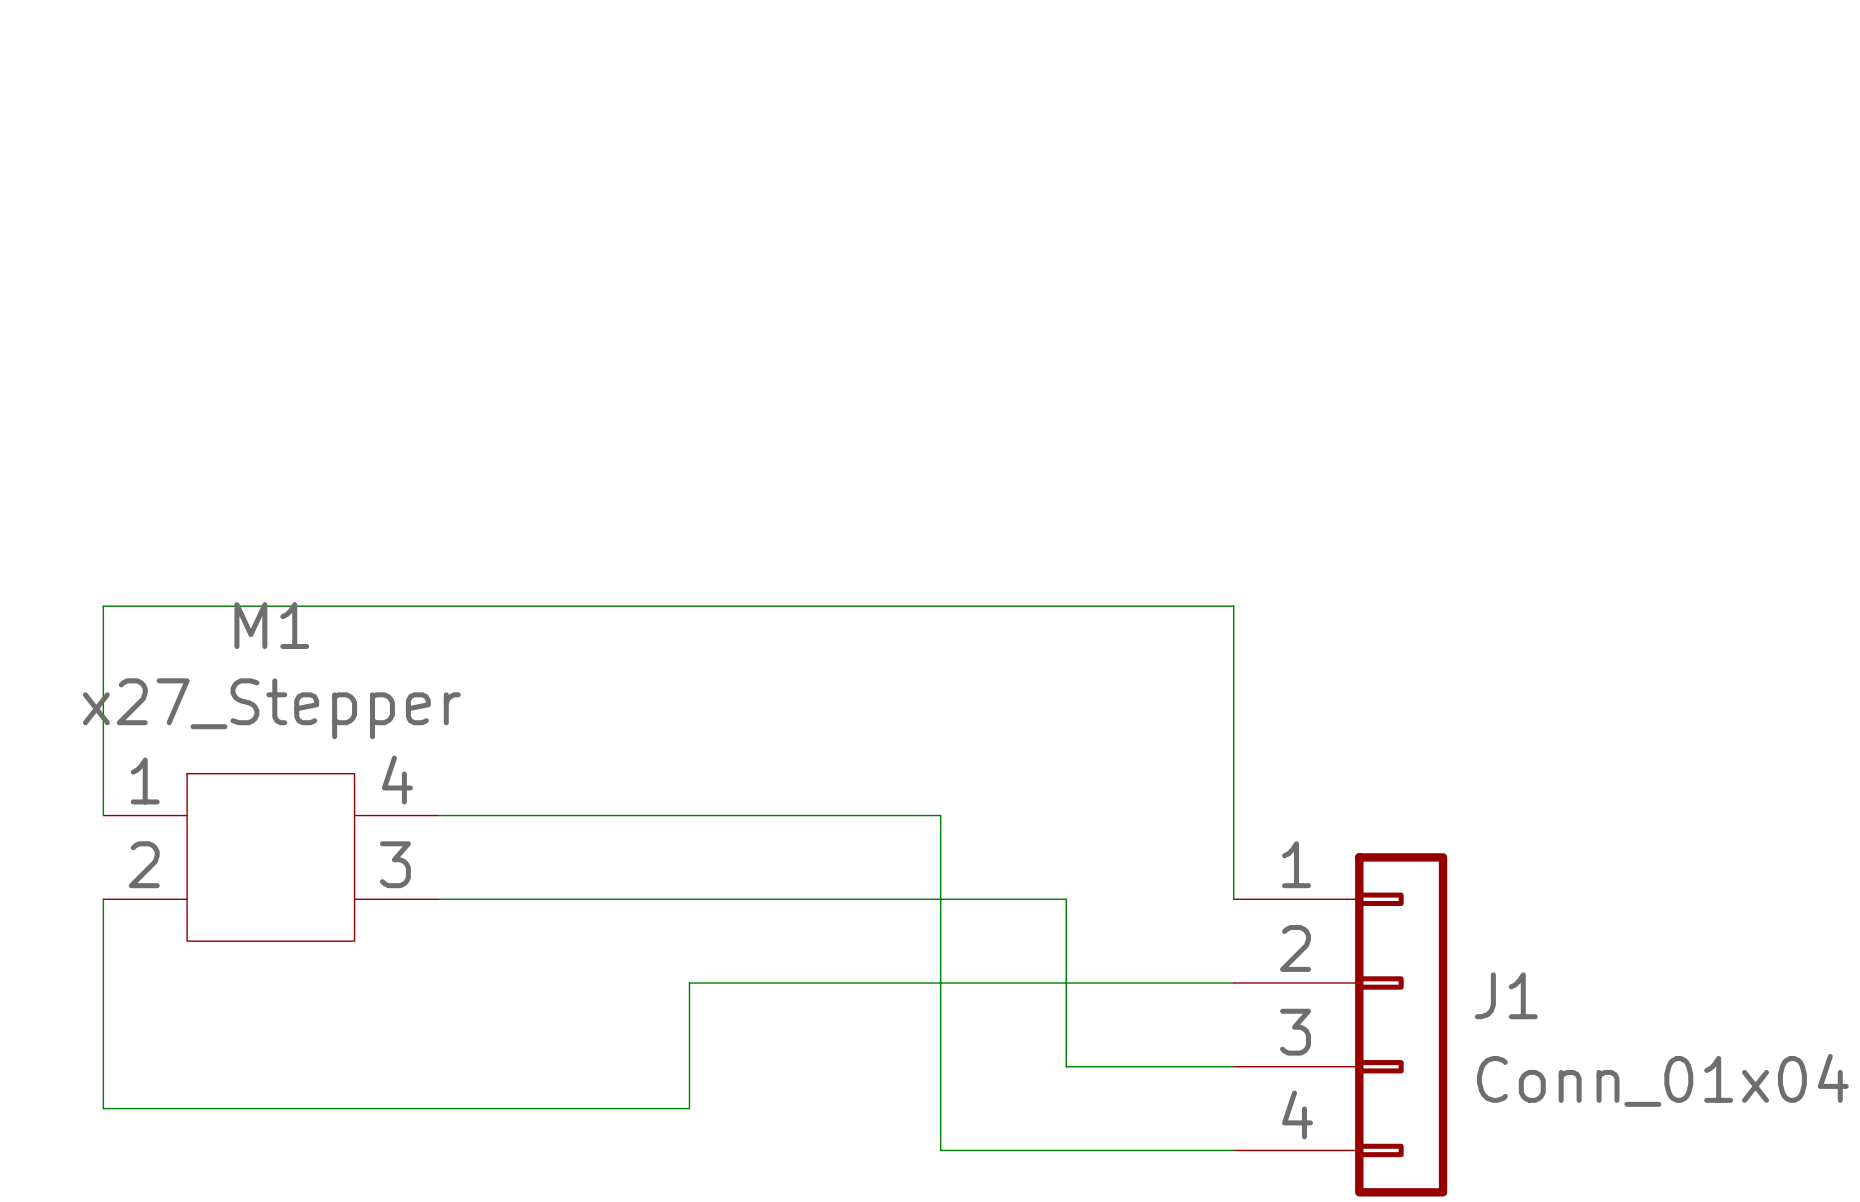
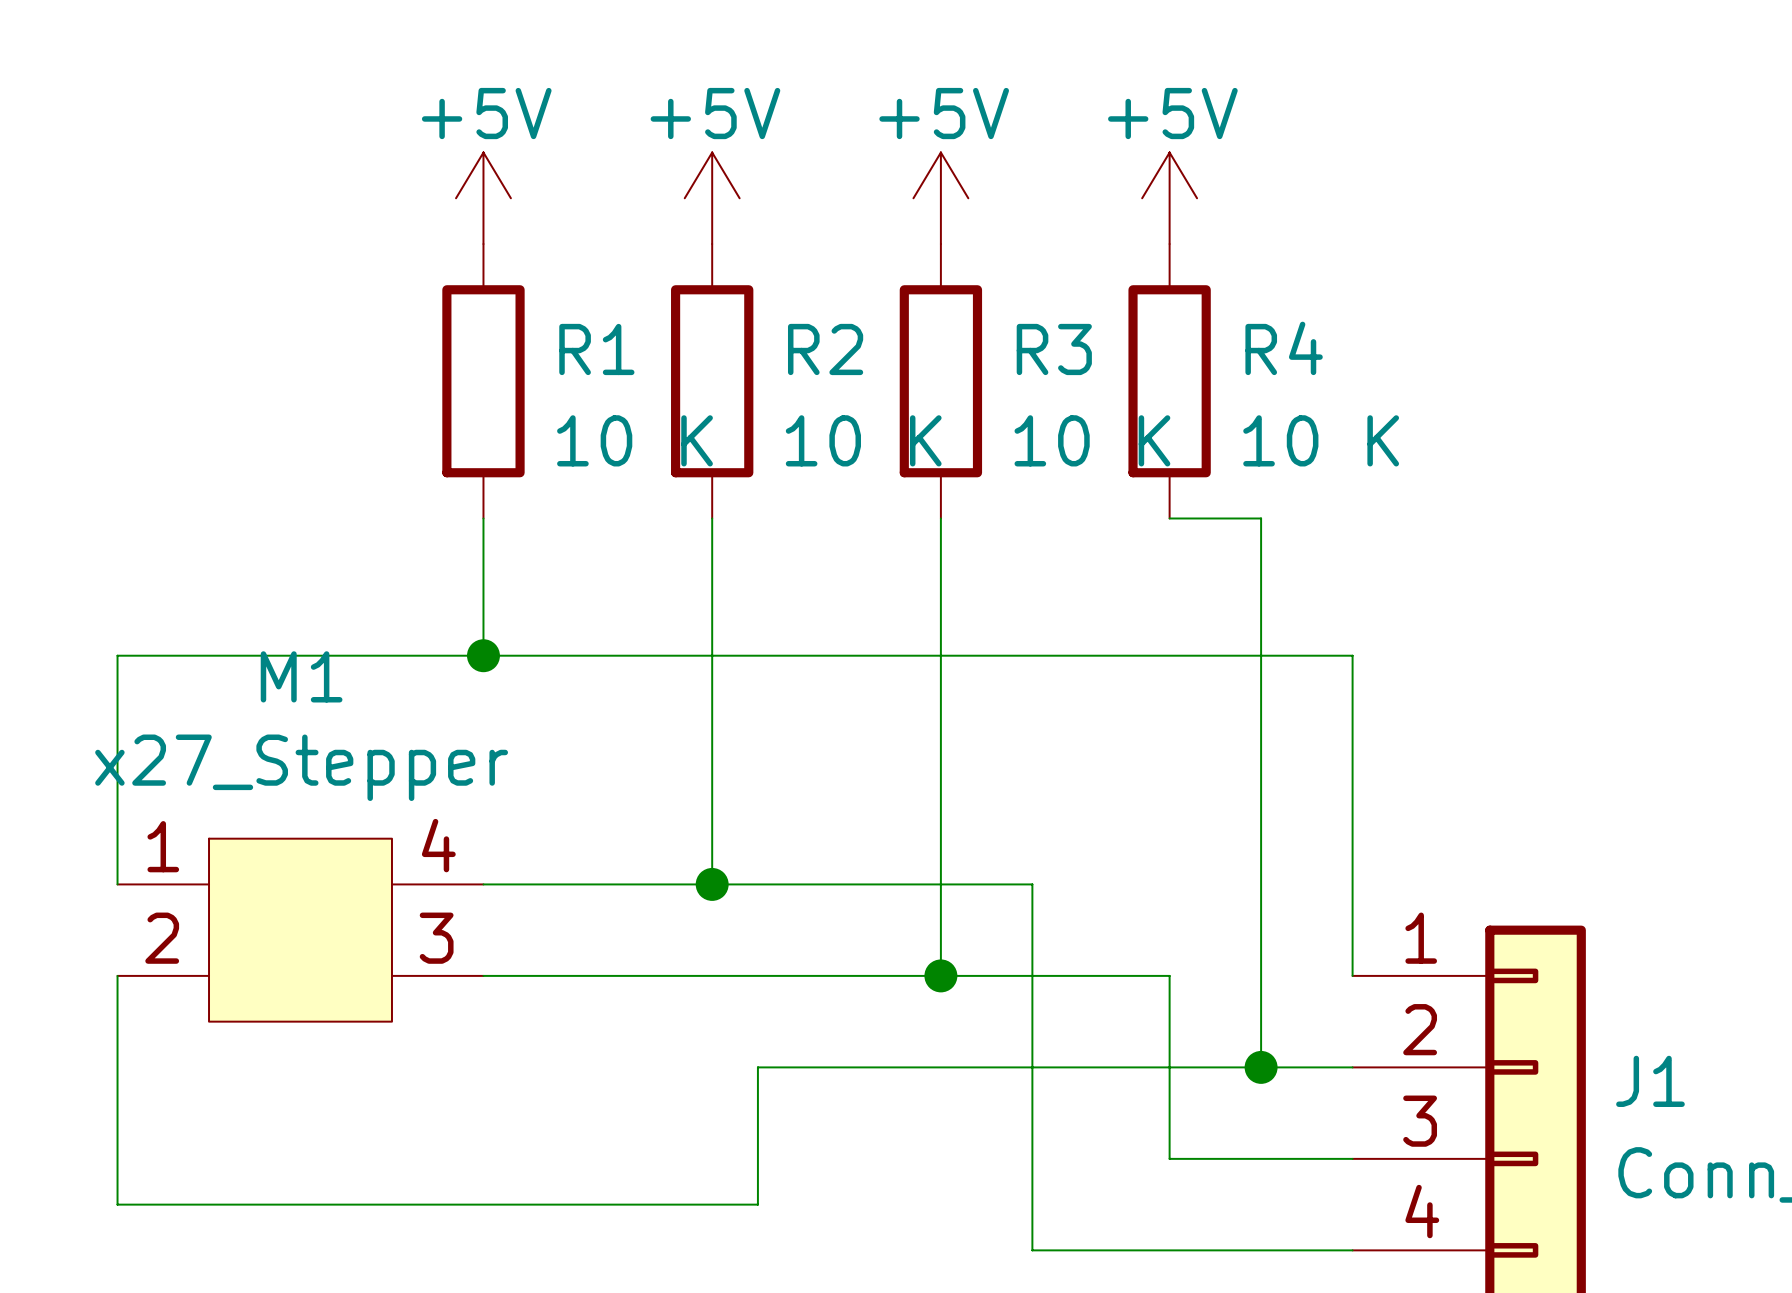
power symbol: none -> +5V (483, 198)
power symbol: none -> +5V (712, 198)
power symbol: none -> +5V (940, 198)
power symbol: none -> +5V (1169, 198)
R1: none -> 10 K (483, 381)
R2: none -> 10 K (712, 381)
R3: none -> 10 K (940, 381)
R4: none -> 10 K (1169, 381)
wire: none -> (483, 518) (483, 655)
wire: none -> (712, 518) (712, 884)
wire: none -> (940, 518) (940, 975)
wire: none -> (1169, 518) (1261, 518) (1261, 1067)
junction: none -> (483, 655)
junction: none -> (712, 884)
junction: none -> (940, 975)
junction: none -> (1261, 1067)

